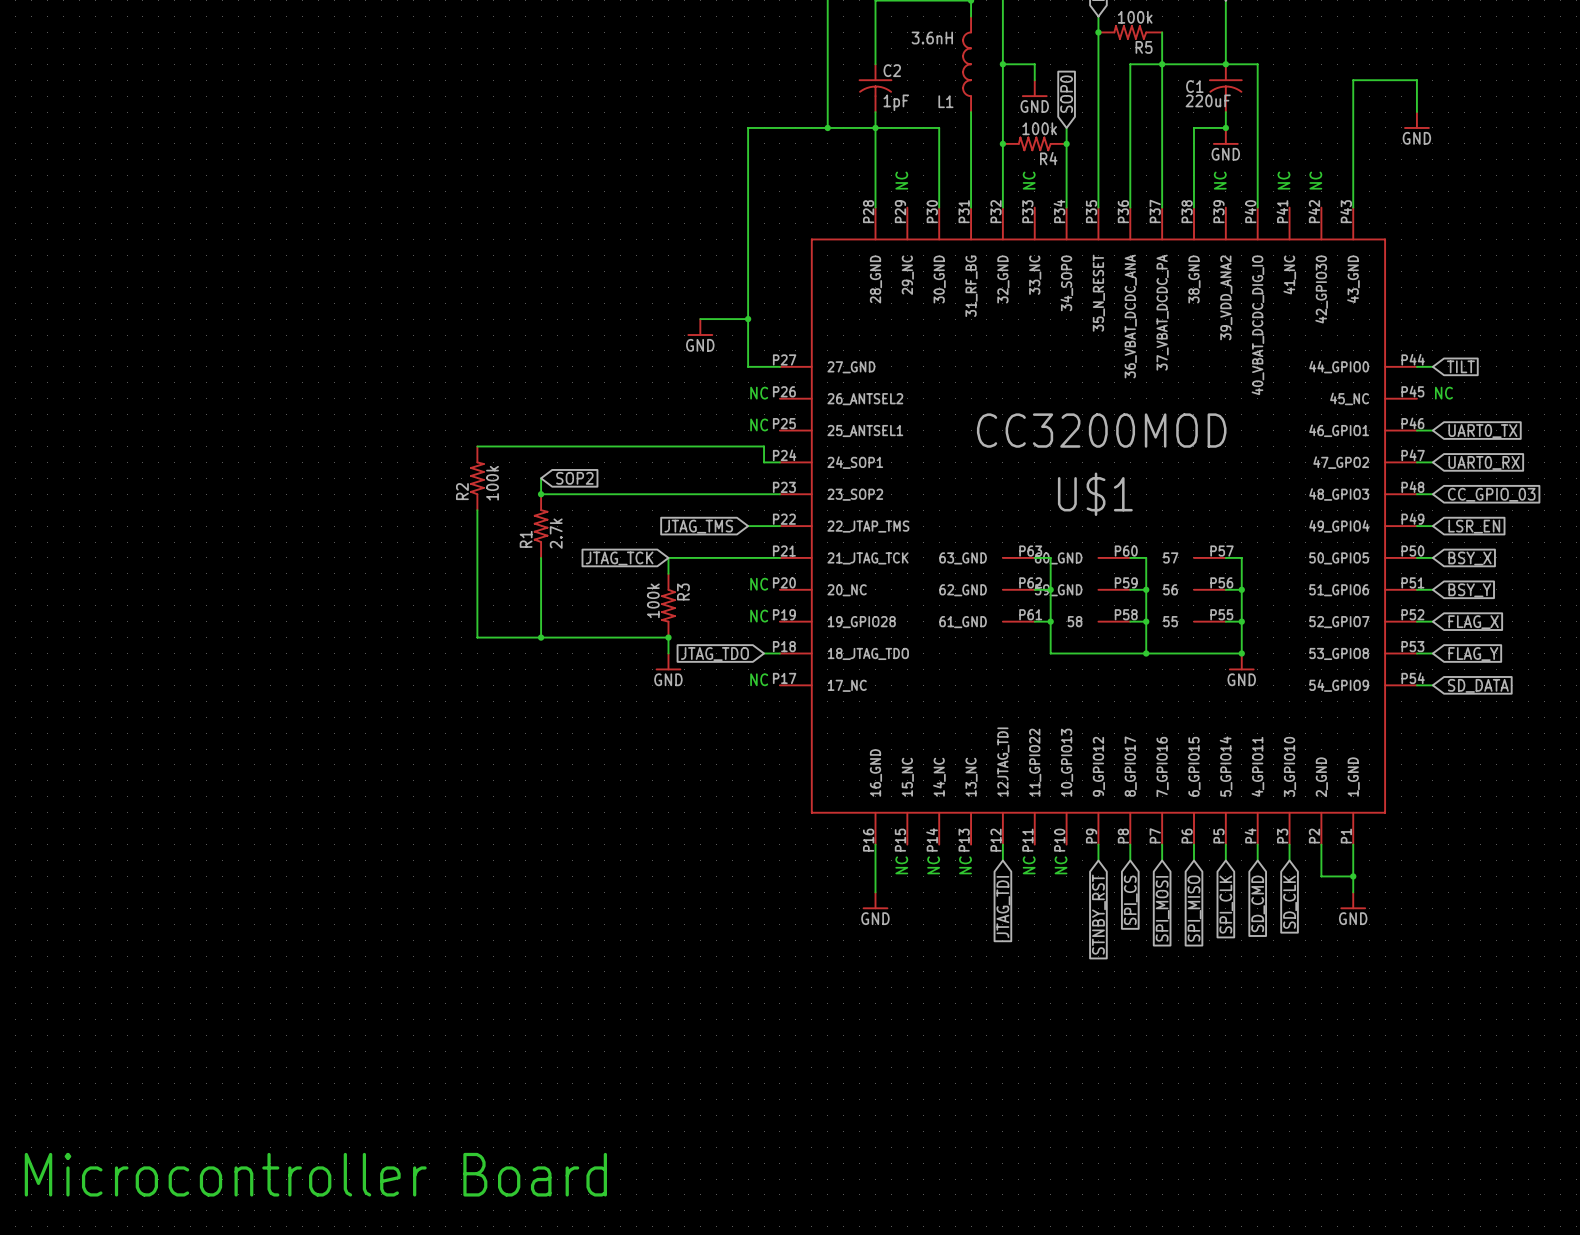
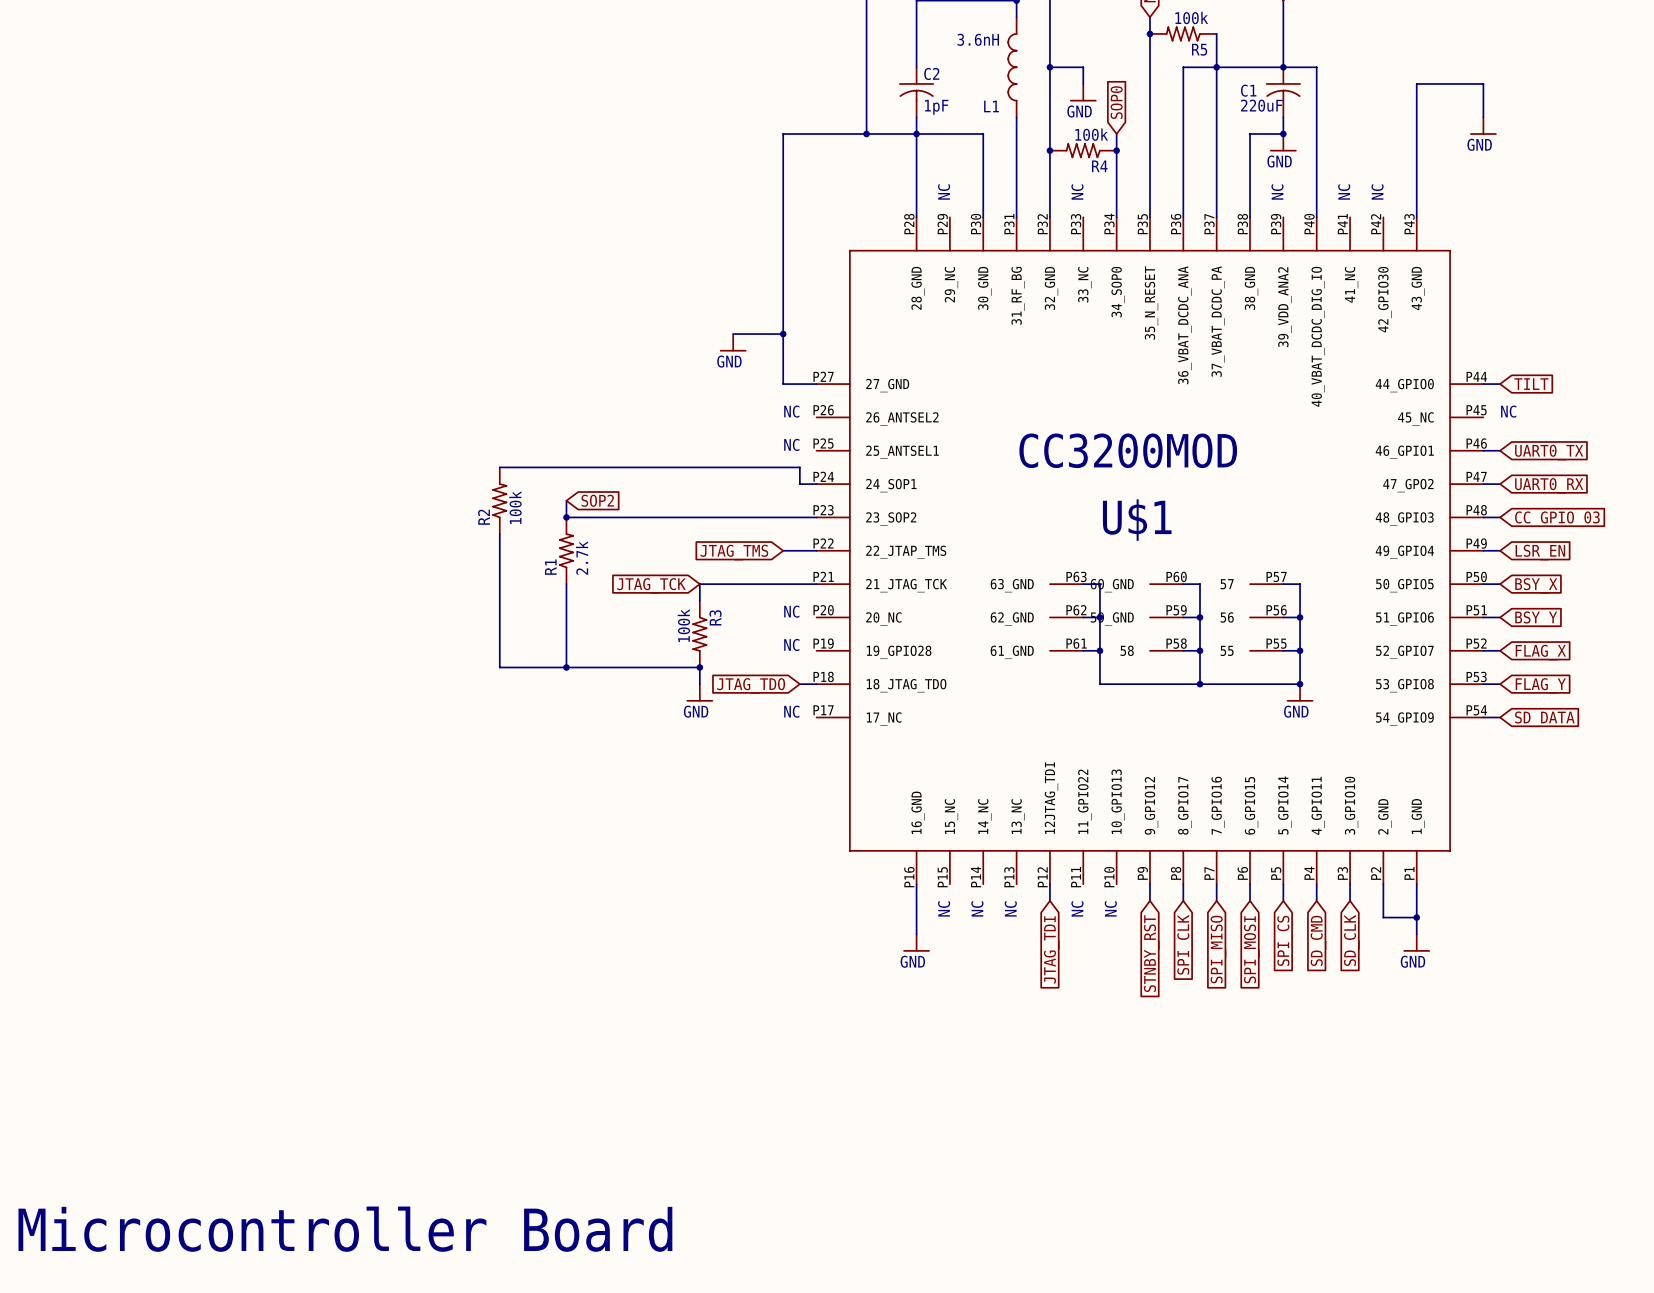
global label: SPI_CS (1130, 900) -> SPI_CLK (1185, 944)
global label: SPI_CLK (1226, 904) -> SPI_CS (1285, 940)
global label: SPI_MOSI (1162, 908) -> SPI_MISO (1218, 949)
global label: SPI_MISO (1194, 908) -> SPI_MOSI (1251, 949)

